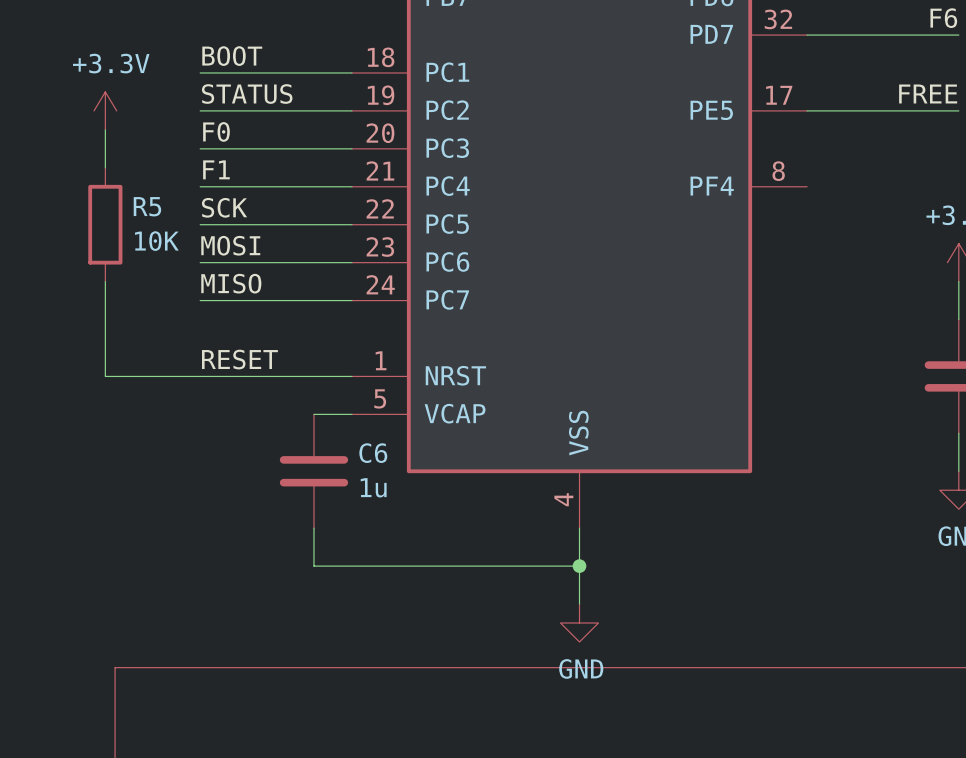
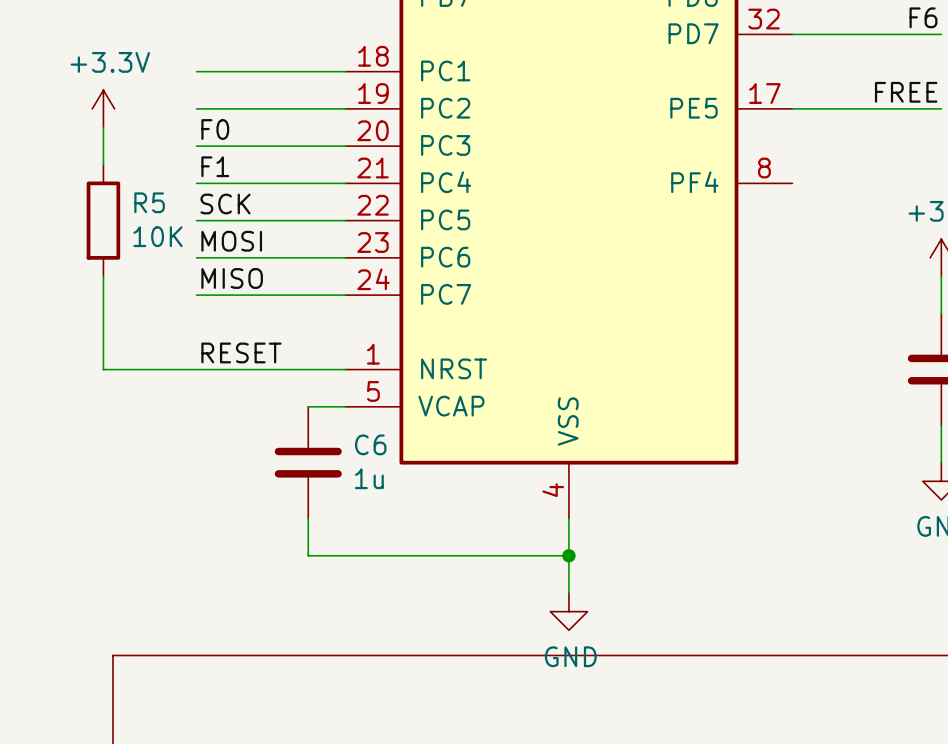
label: BOOT (232, 56) -> none
label: STATUS (247, 94) -> none

